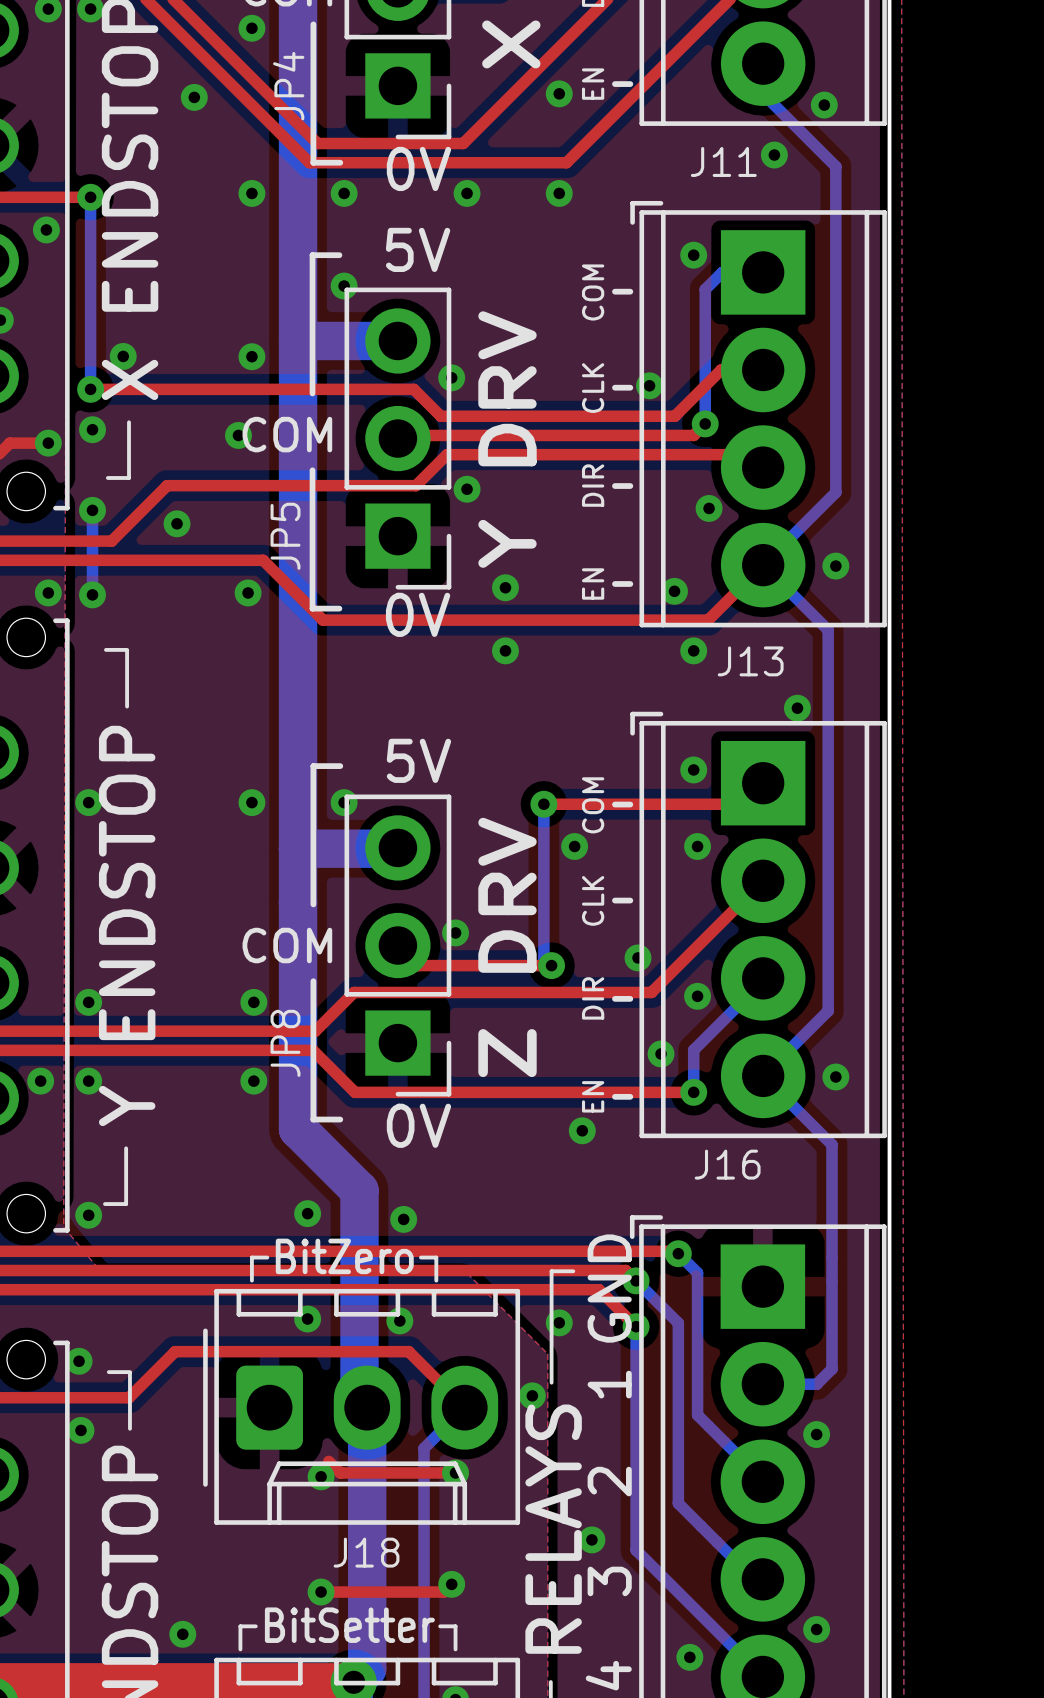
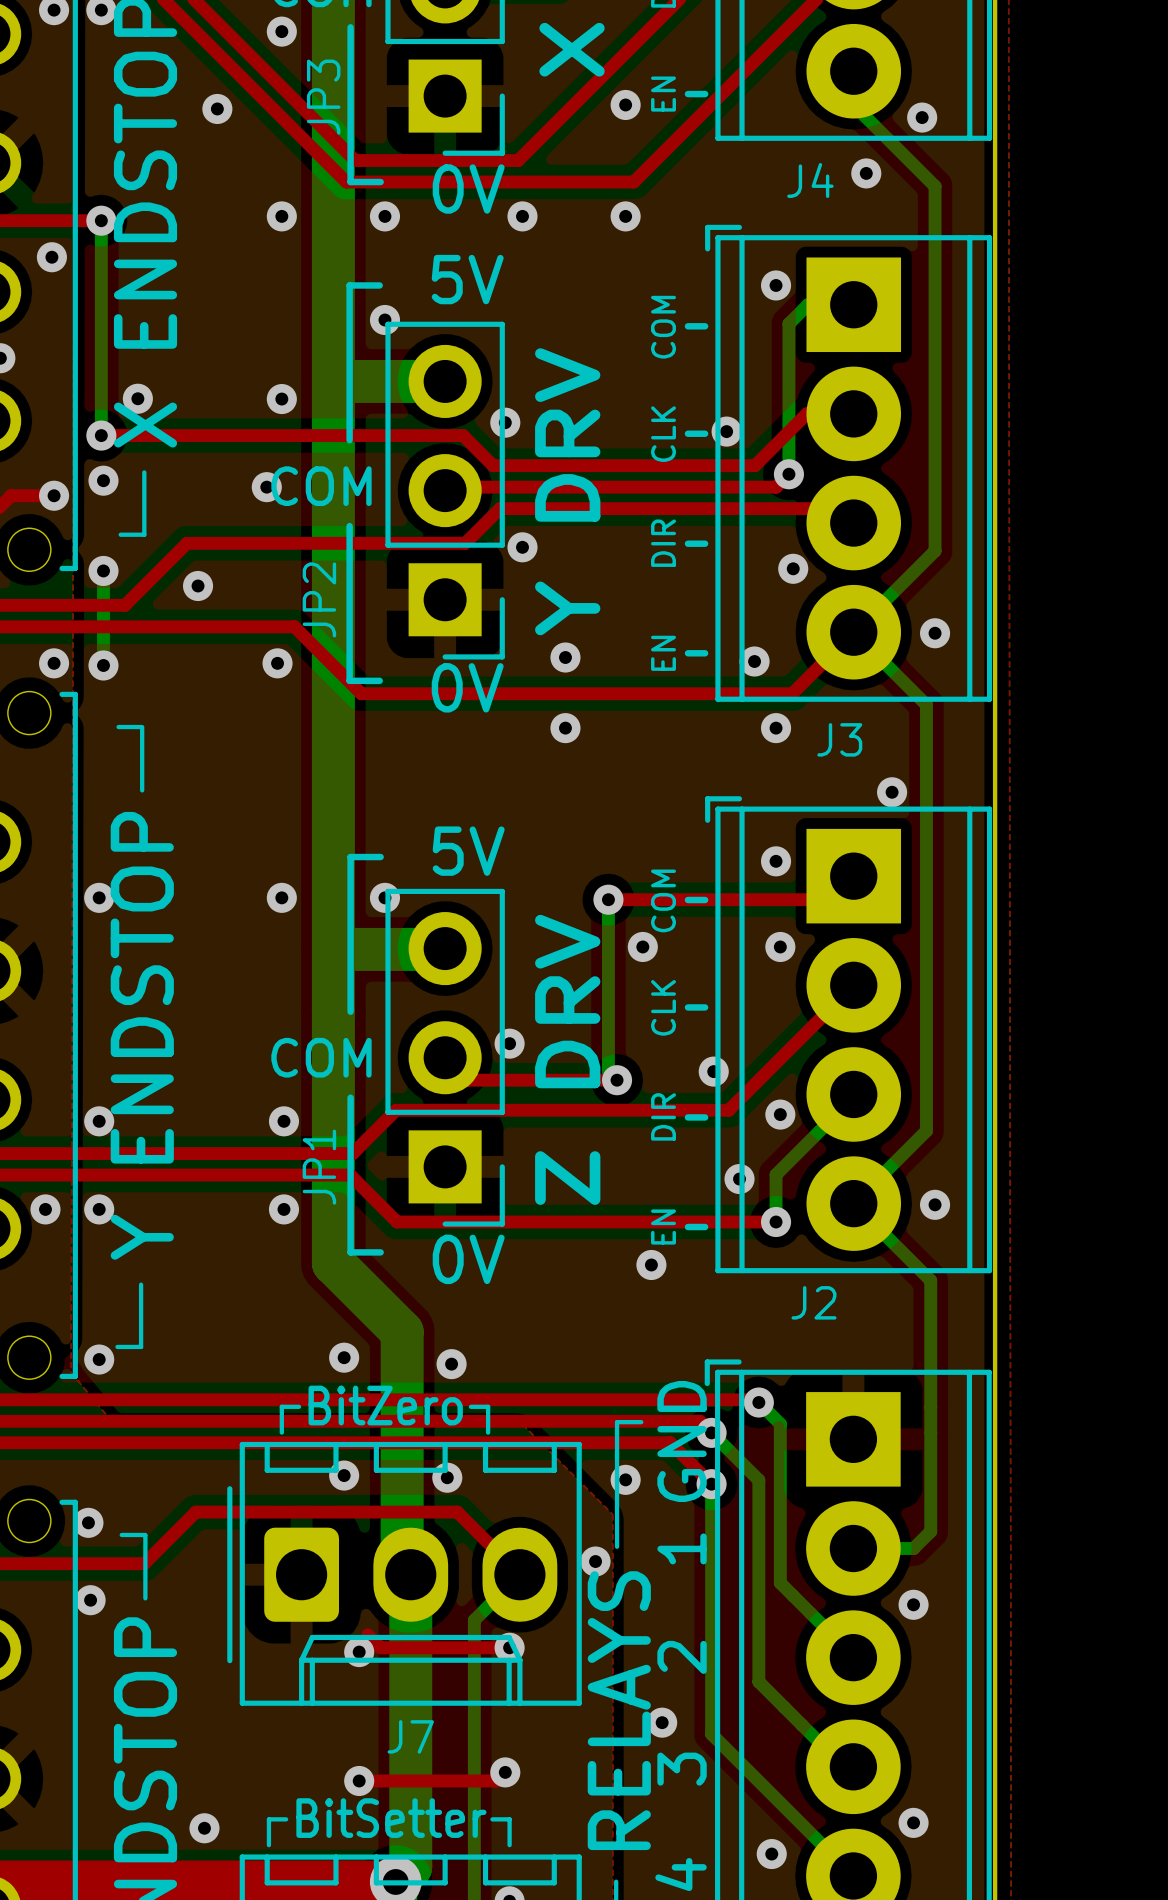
JP4 name: JP4 (288, 86) -> JP3 (323, 97)
J11 name: J11 (723, 161) -> J4 (810, 180)
JP5 name: JP5 (285, 536) -> JP2 (319, 599)
J13 name: J13 (750, 661) -> J3 (839, 739)
JP8 name: JP8 (285, 1043) -> JP1 (319, 1167)
J16 name: J16 (727, 1164) -> J2 (814, 1302)
J18 name: J18 (366, 1552) -> J7 (410, 1736)

